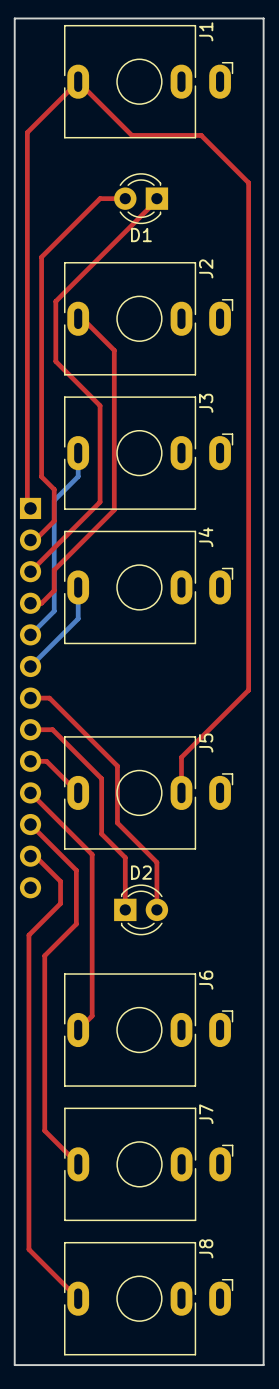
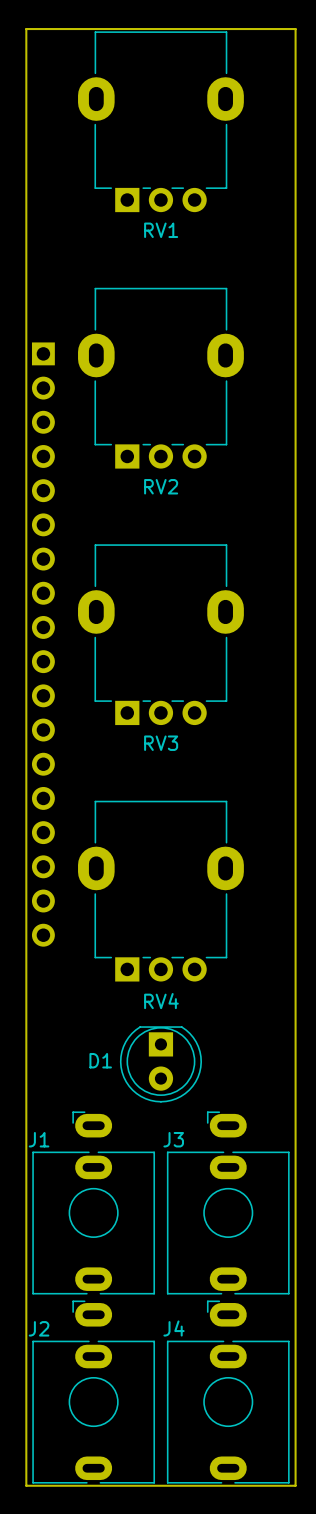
J1 rotation: 0° (148, 81) -> 90° counterclockwise (93, 1202)
J1 position: (148, 81) -> (93, 1202)
RV1: none -> (160, 121)
D1 footprint: [114, 173, 169, 225] -> [119, 1026, 203, 1103]
top track: (125, 198) (100, 198) (41, 257) (41, 476) (54, 489) (54, 521) (35, 540) (30, 540) -> none
top track: (156, 198) (55, 301) (55, 361) (100, 405) (100, 502) (30, 571) -> none
D1 name position: D1 (141, 235) -> D1 (100, 1060)
top track: (78, 318) (82, 318) (114, 350) (114, 510) (54, 570) (54, 590) (41, 603) (30, 603) -> none
J2 rotation: 0° (148, 318) -> 90° counterclockwise (93, 1392)
J2 position: (148, 318) -> (93, 1392)
RV2: none -> (160, 378)
bottom track: (78, 453) (78, 476) (54, 500) (54, 611) (30, 634) -> none
J3 rotation: 0° (148, 453) -> 90° counterclockwise (228, 1202)
J3 position: (148, 453) -> (228, 1202)
top track: (30, 508) (27, 505) (27, 132) (78, 81) (131, 135) (201, 135) (248, 182) (248, 690) (181, 757) (181, 792) -> none
RV3: none -> (160, 634)
part: none -> (43, 644)
bottom track: (78, 587) (78, 618) (30, 666) -> none
J4 rotation: 0° (148, 587) -> 90° counterclockwise (228, 1392)
J4 position: (148, 587) -> (228, 1392)
top track: (30, 698) (49, 698) (117, 766) (117, 822) (156, 862) (156, 909) -> none
part: (30, 698) -> none
top track: (30, 729) (52, 729) (101, 778) (101, 834) (125, 857) (125, 909) -> none
top track: (30, 761) (46, 761) (78, 792) -> none
top track: (30, 792) (92, 854) (92, 1016) (78, 1030) -> none
J5: (148, 792) -> none
RV4: none -> (160, 891)
top track: (30, 824) (76, 870) (76, 924) (44, 955) (44, 1130) (78, 1164) -> none
top track: (30, 856) (35, 856) (60, 881) (60, 903) (28, 935) (28, 1249) (78, 1298) -> none
D2: (141, 909) -> none
J6: (148, 1030) -> none
J7: (148, 1164) -> none
J8: (148, 1298) -> none

